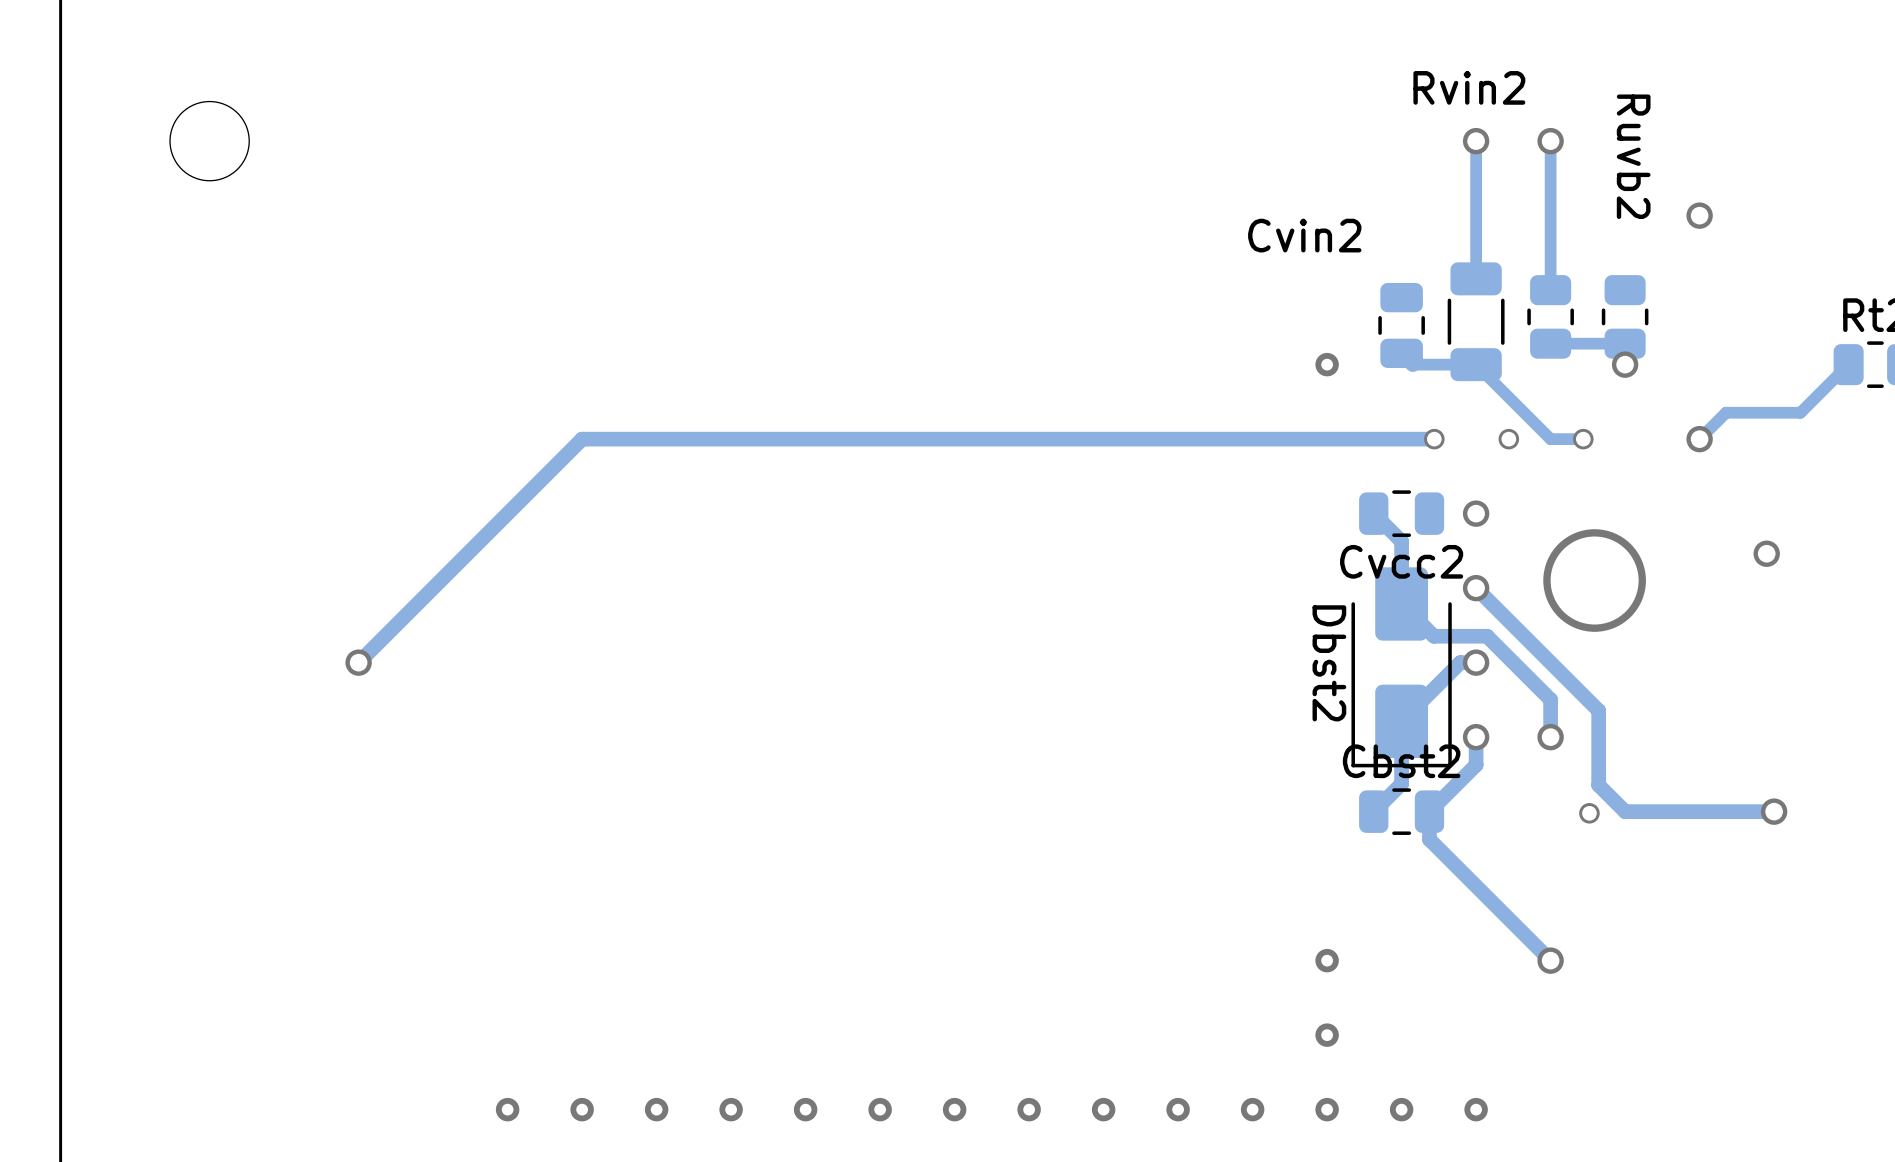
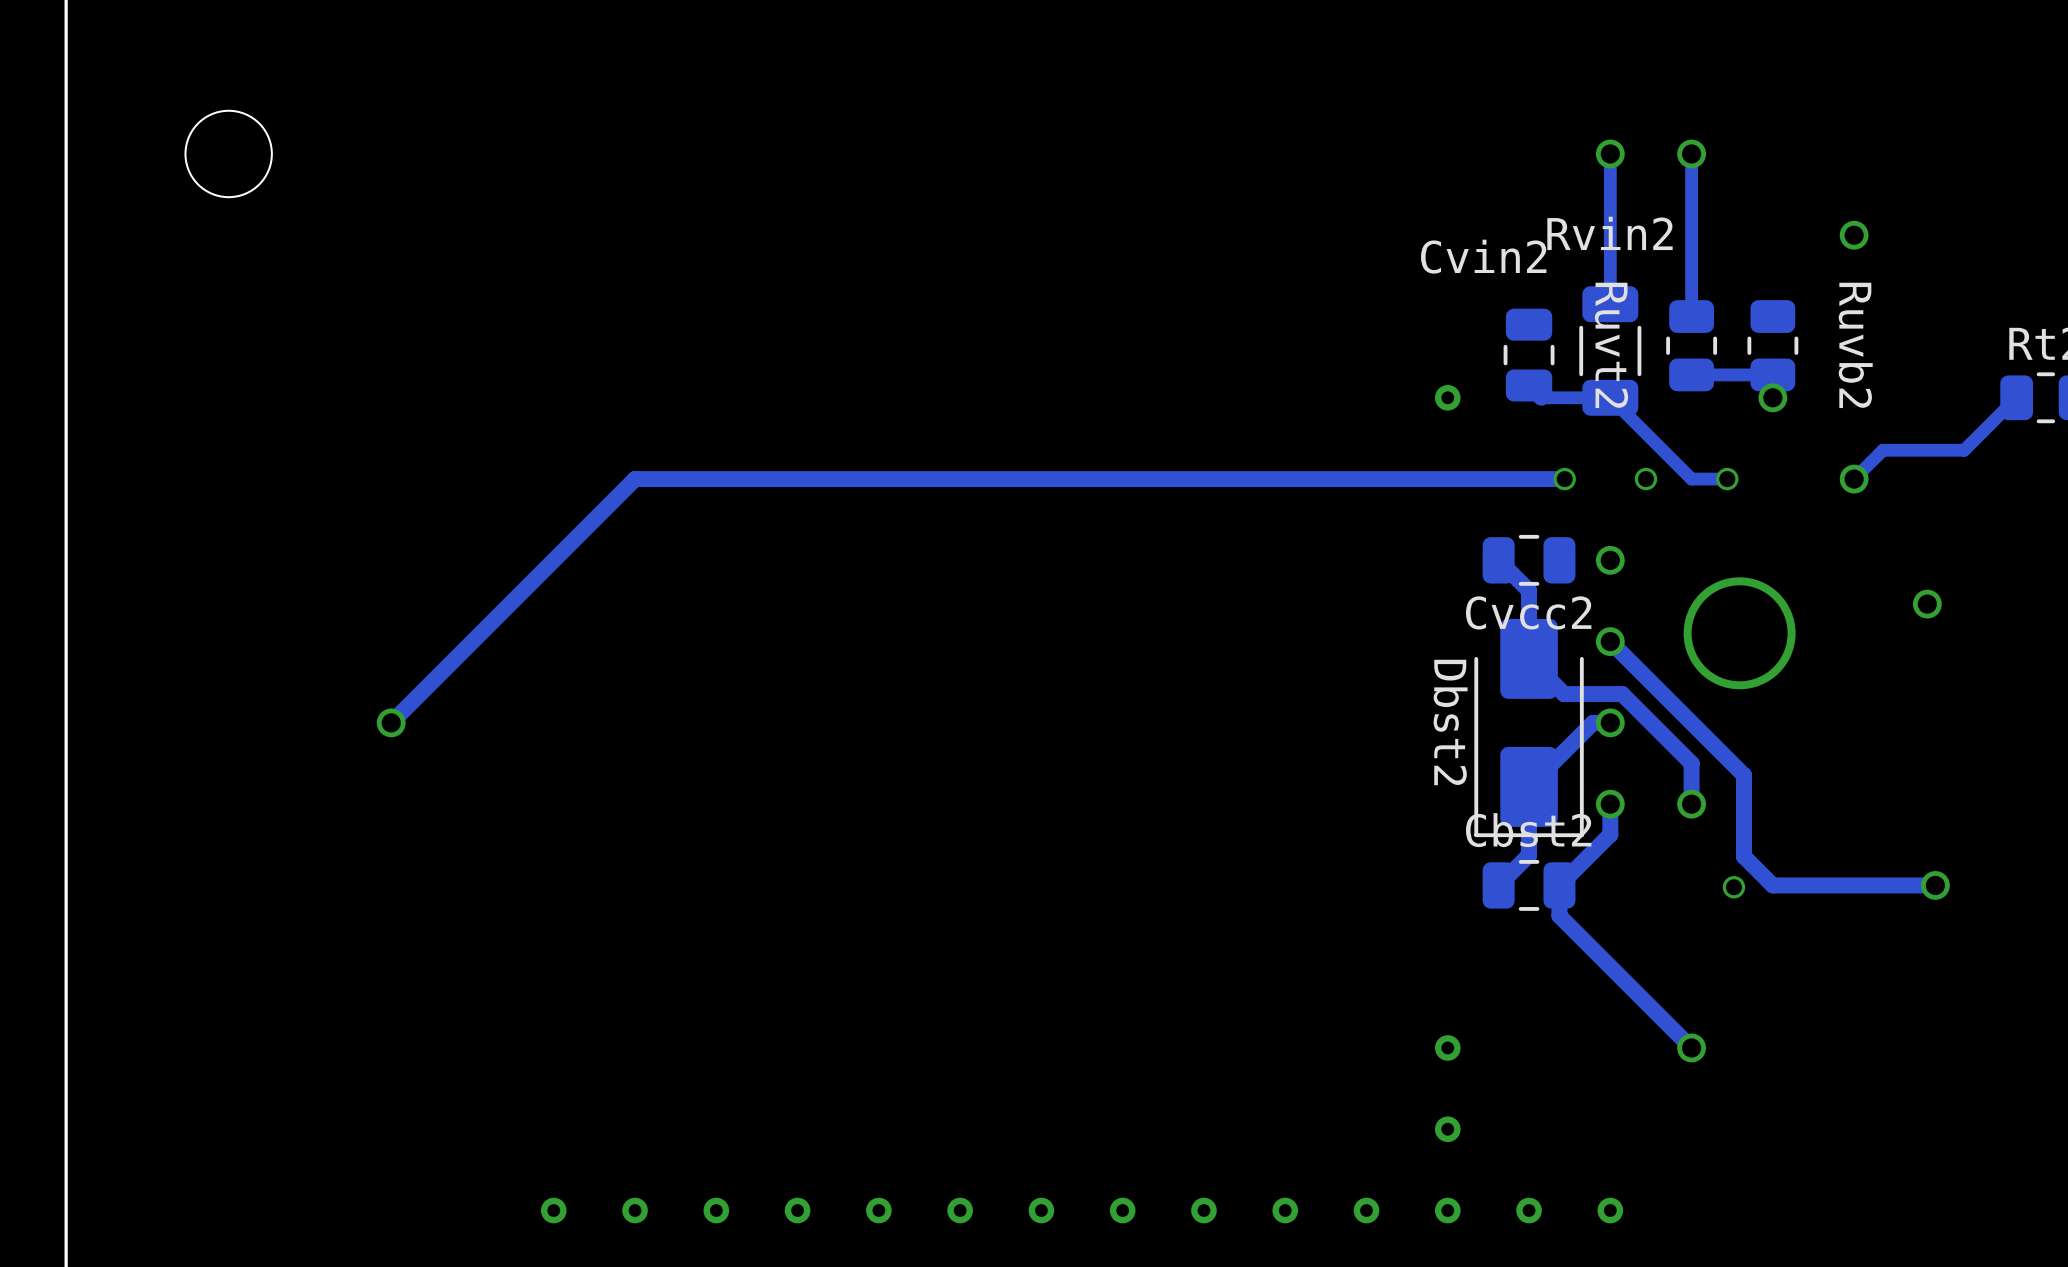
Rvin2 name position: Rvin2 (1469, 87) -> Rvin2 (1609, 233)
Ruvb2 name position: Ruvb2 (1633, 156) -> Ruvb2 (1855, 345)
Cvin2 name position: Cvin2 (1304, 235) -> Cvin2 (1483, 256)
Ruvt2 name: none -> Ruvt2 (1611, 345)

